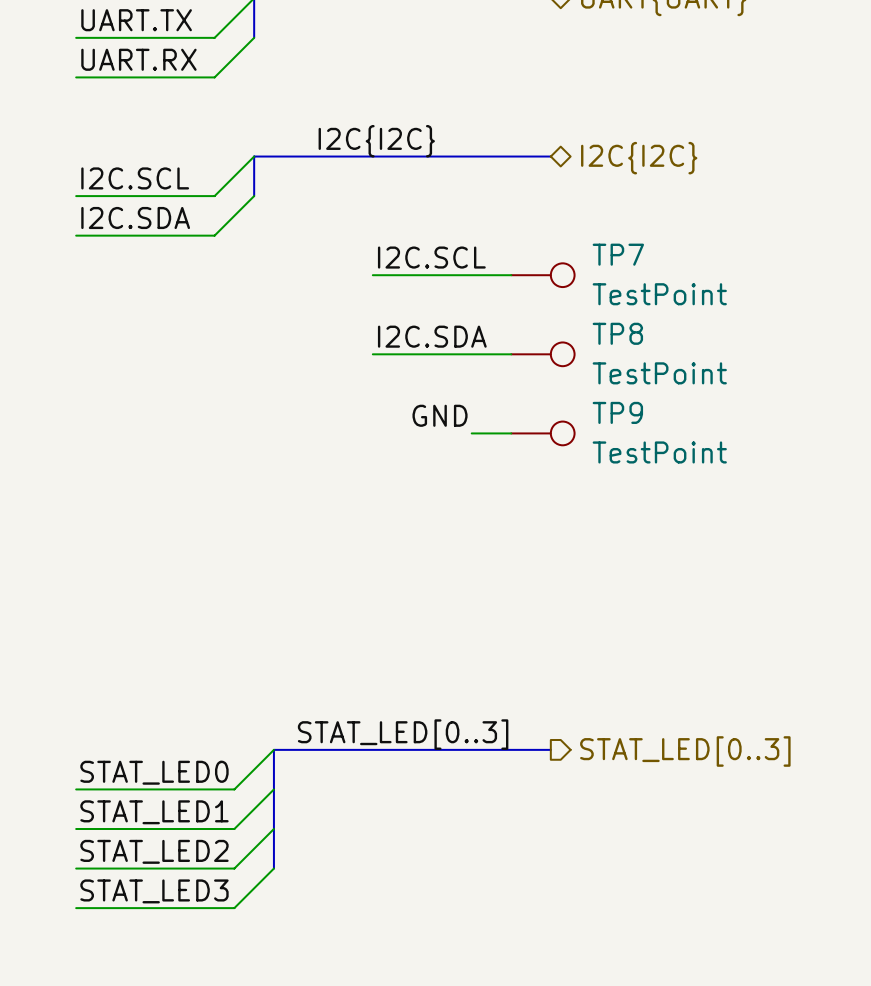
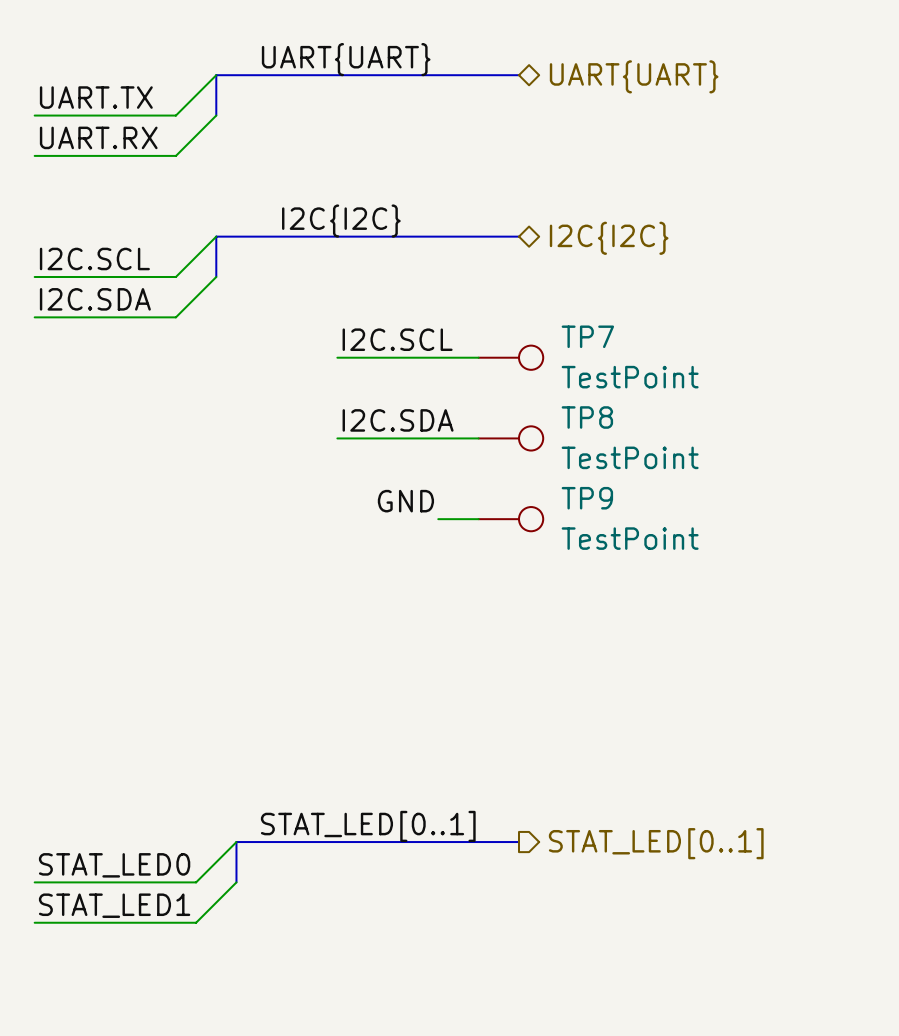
label: STAT_LED[0..3] (403, 734) -> STAT_LED[0..1] (368, 826)
hierarchical label: STAT_LED[0..3] (685, 751) -> STAT_LED[0..1] (656, 843)
bus: (273, 789) (273, 868) -> none
wire: (273, 828) (234, 868) (76, 868) -> none
label: STAT_LED2 (154, 851) -> none
wire: (273, 868) (234, 908) (76, 908) -> none
label: STAT_LED3 (154, 891) -> none

